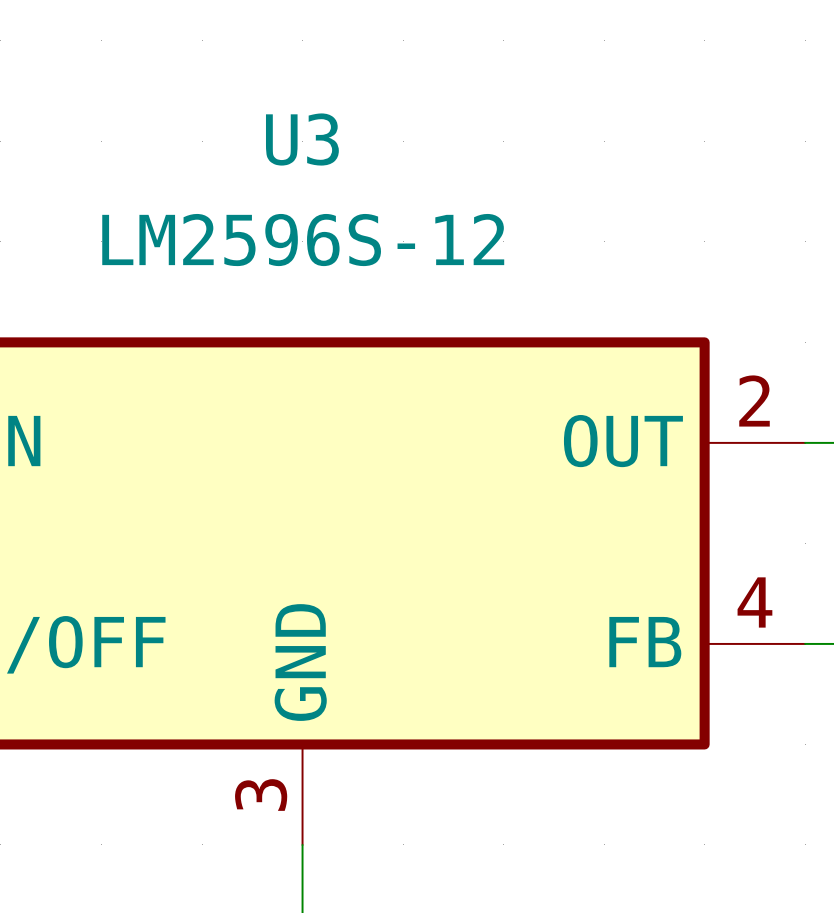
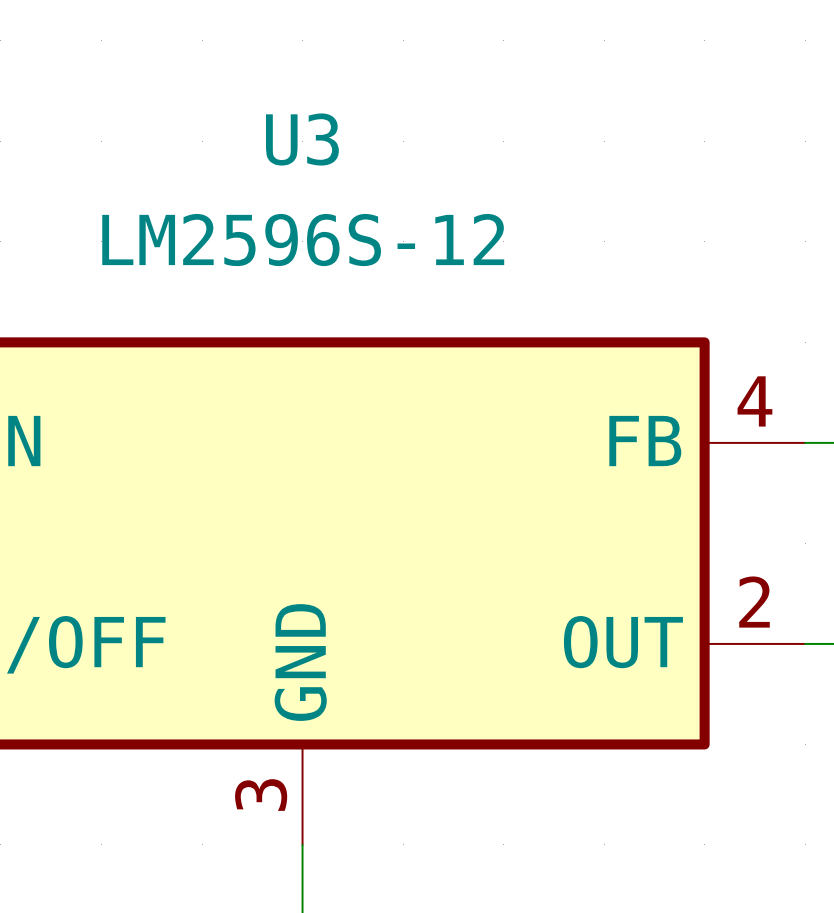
U3 pin number: 2 (754, 400) -> 4 (754, 401)
U3 pin name: OUT (623, 441) -> FB (645, 441)
U3 pin number: 4 (754, 602) -> 2 (754, 602)
U3 pin name: FB (645, 642) -> OUT (623, 642)

